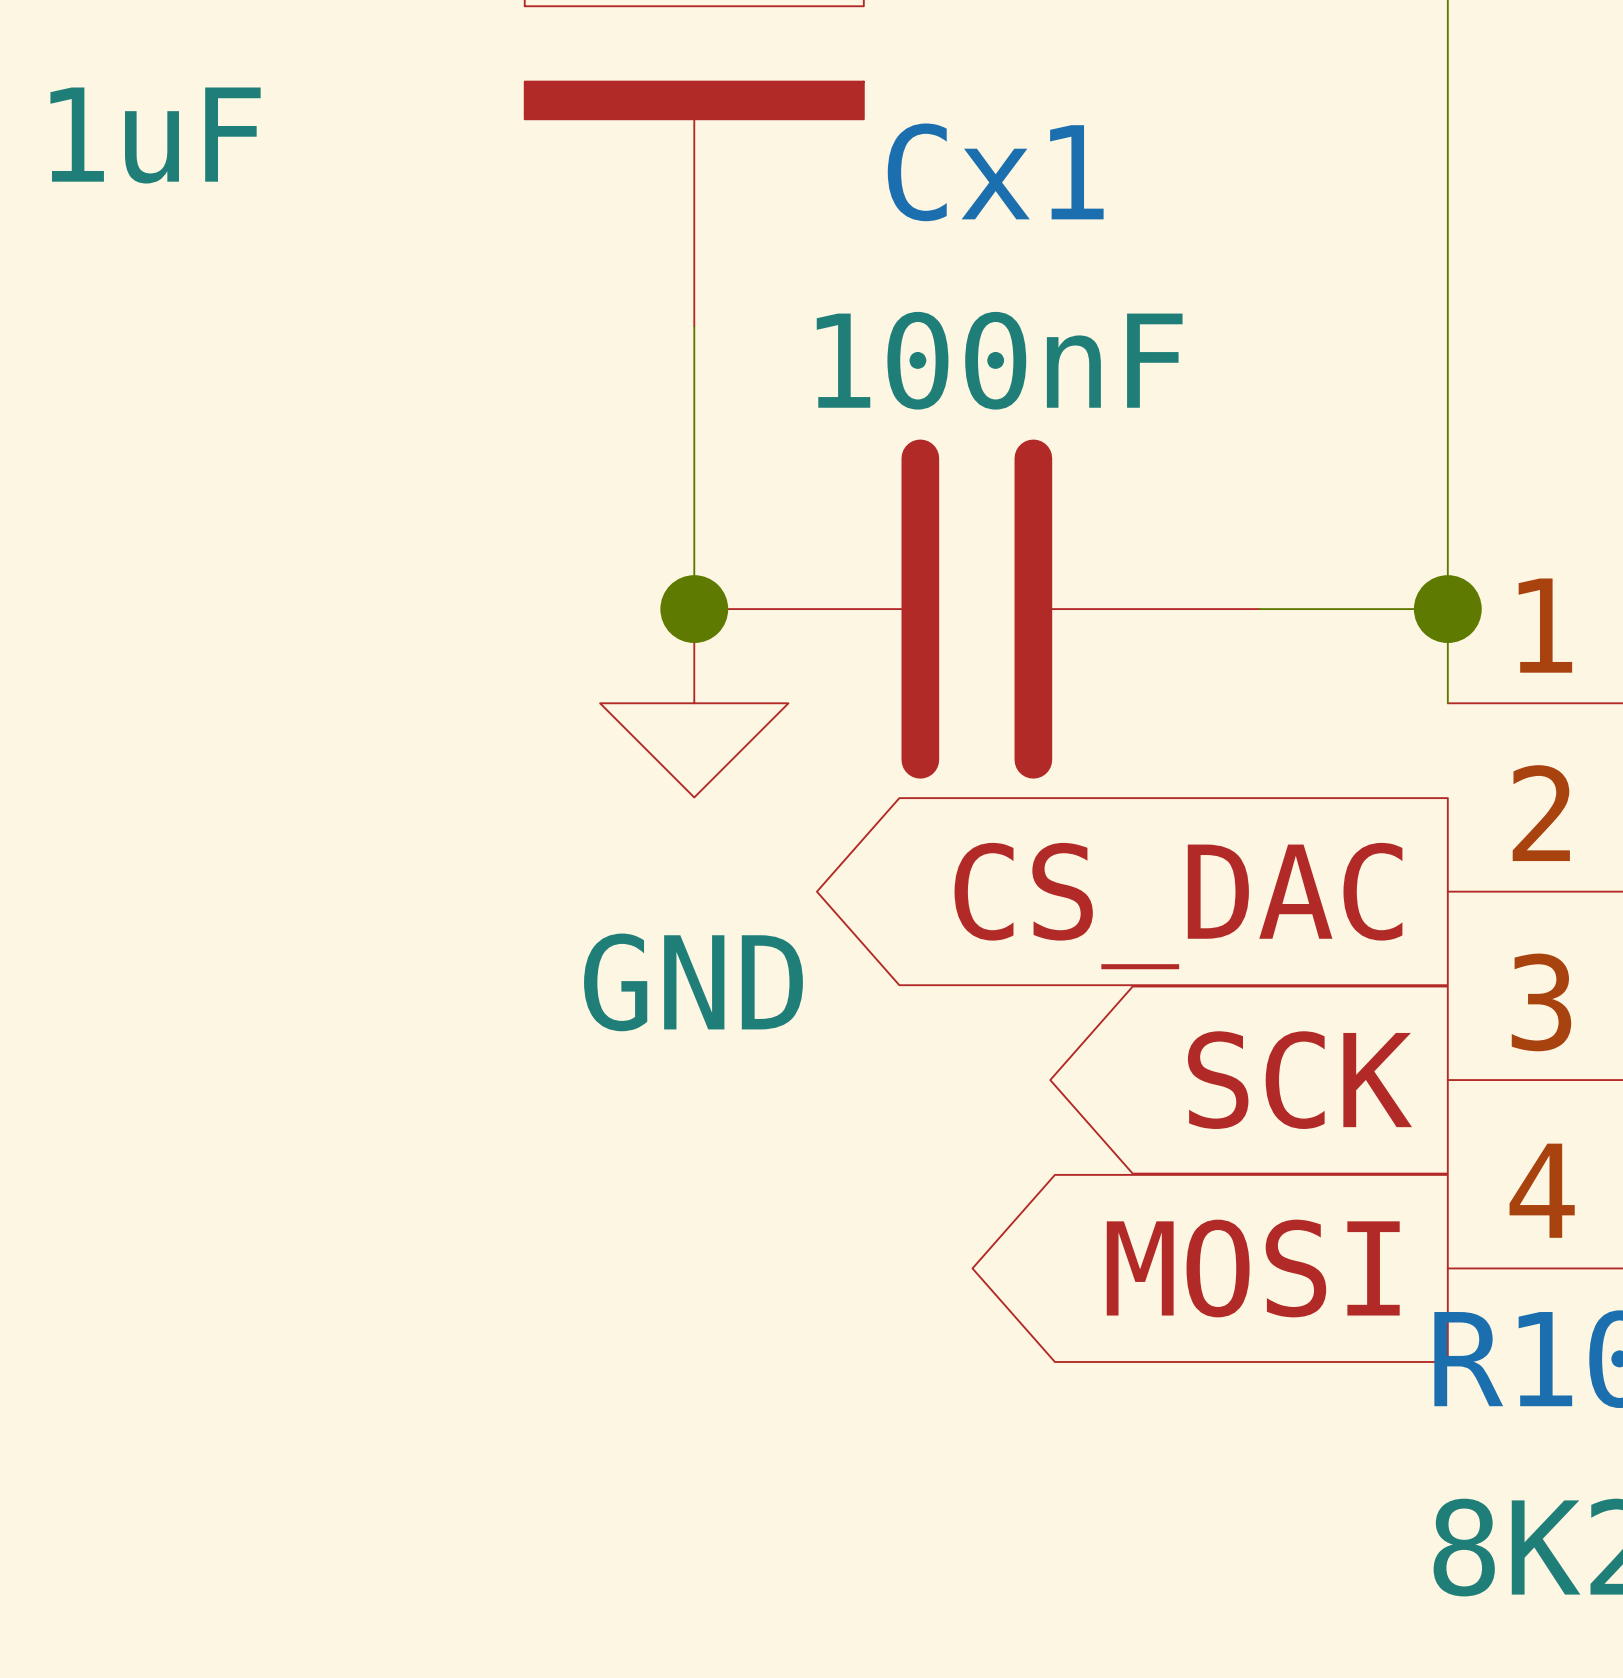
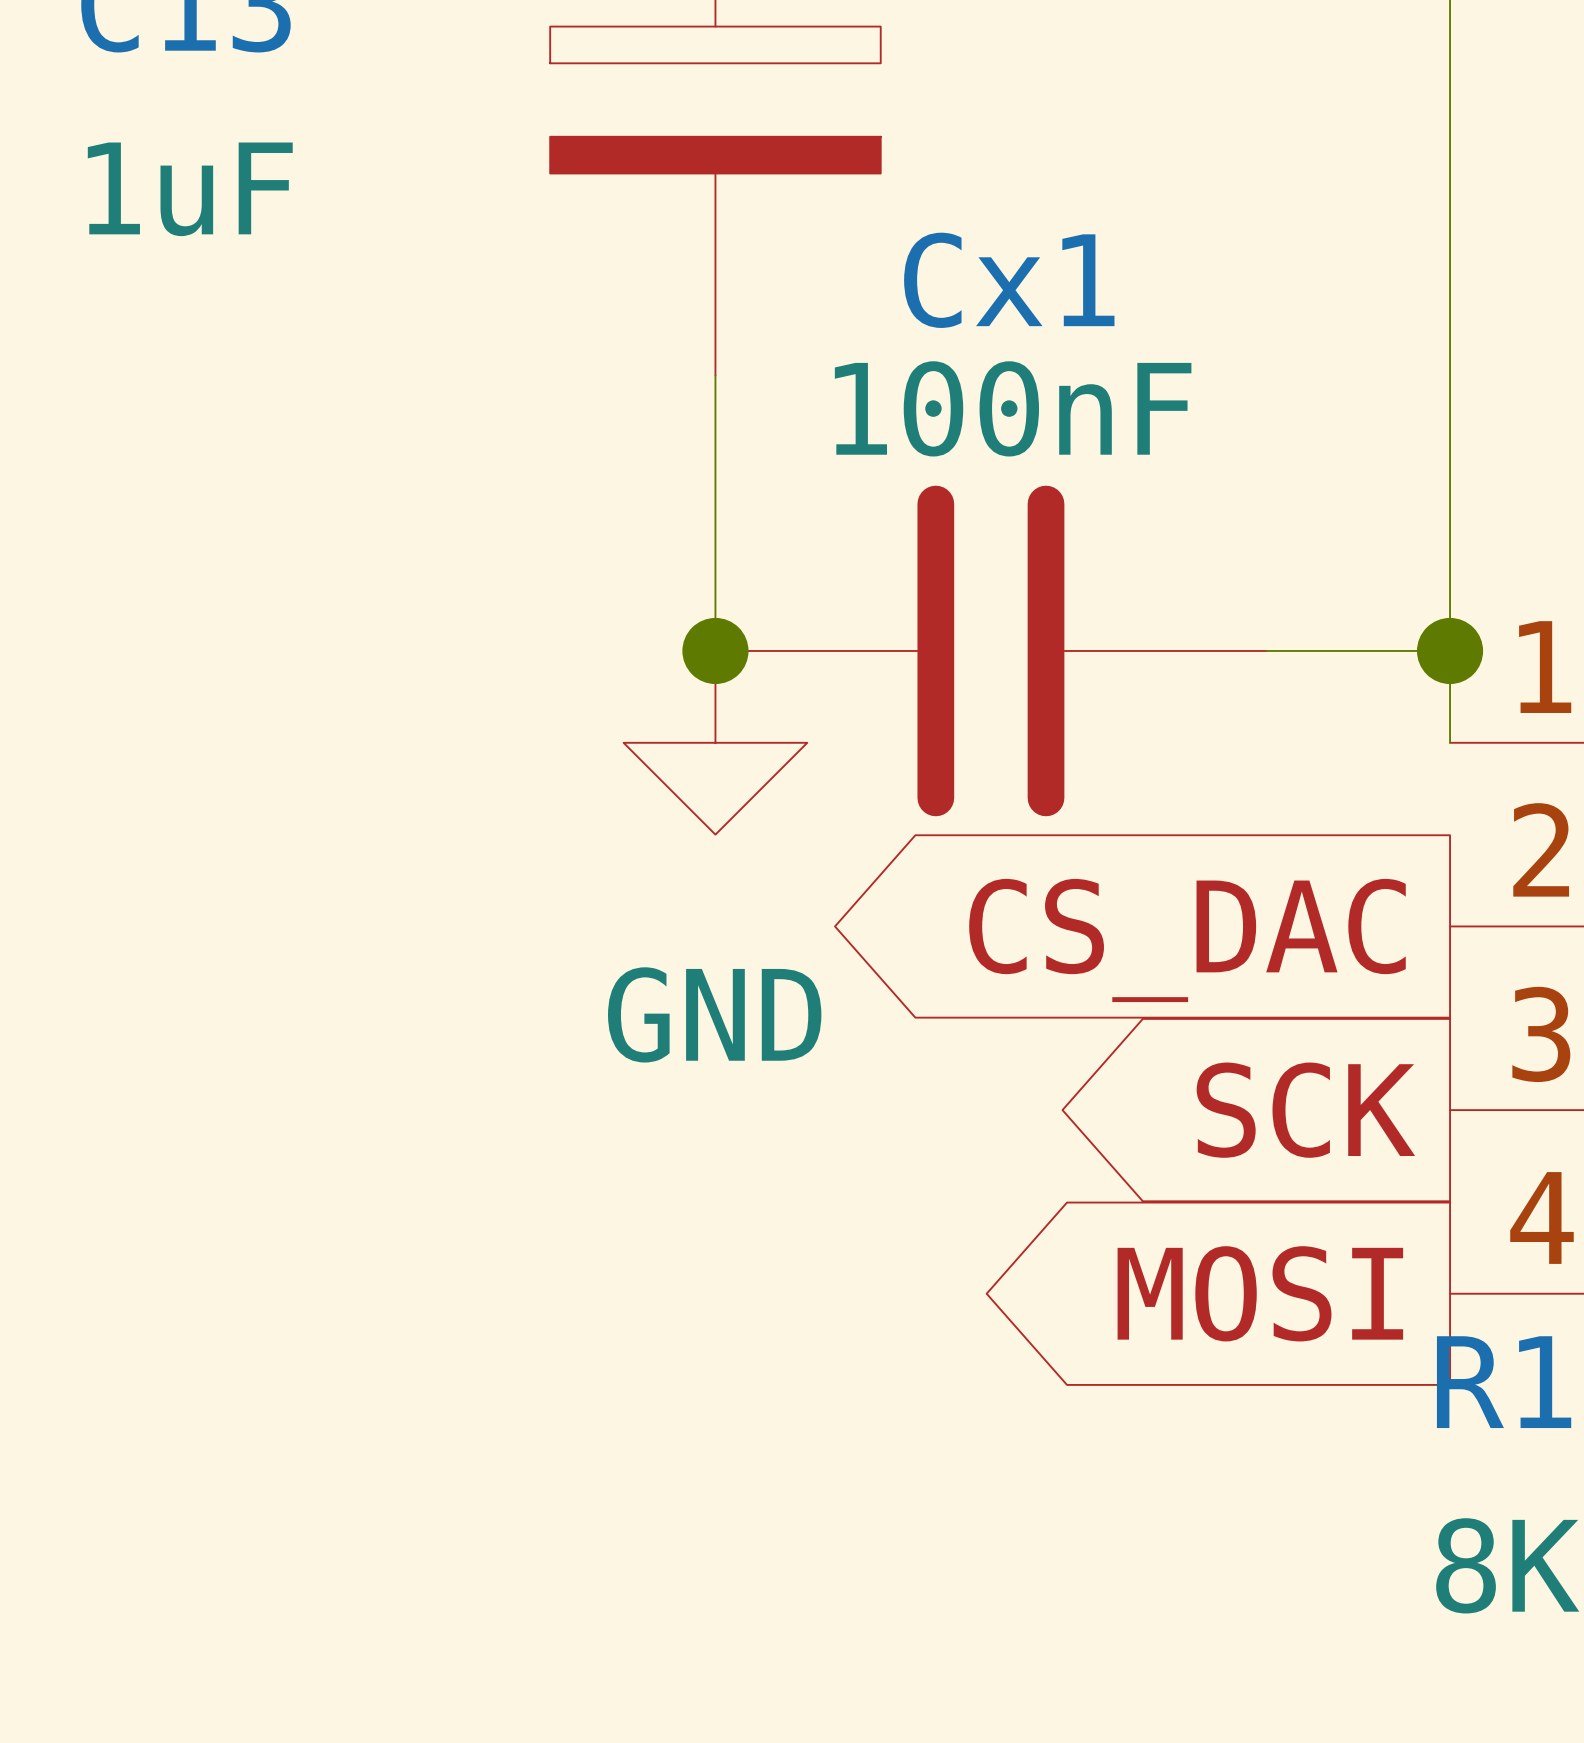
Cx1 name position: Cx1 (995, 172) -> Cx1 (1009, 280)

